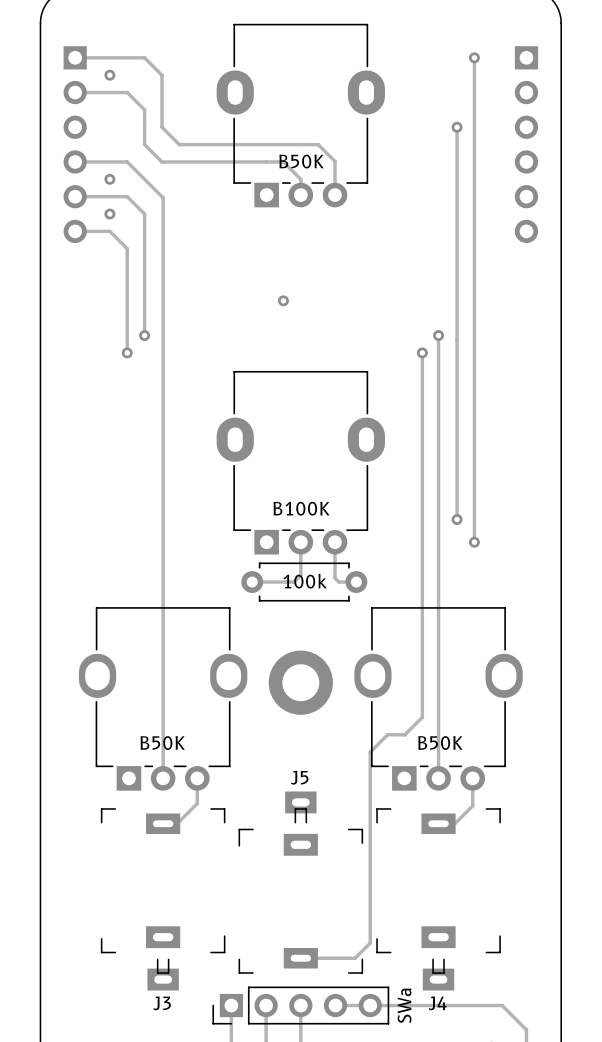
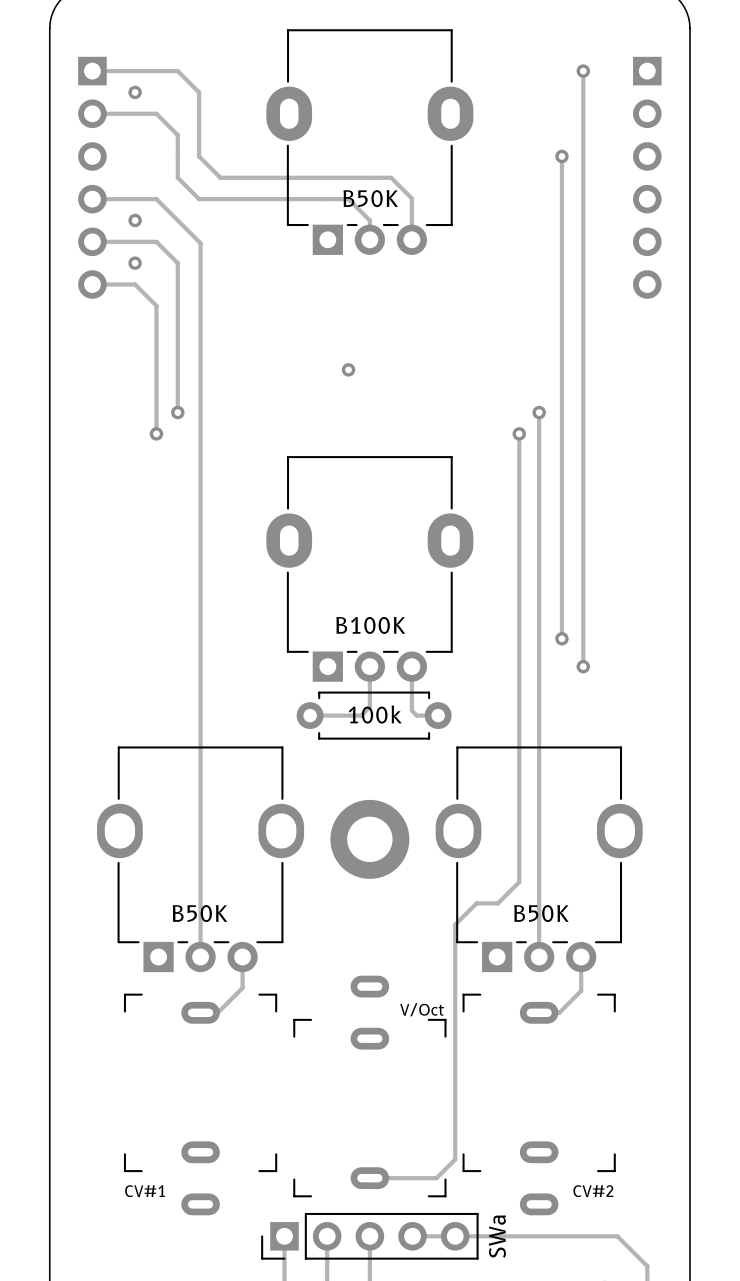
J5: (300, 882) -> none
part: none -> V/Oct (369, 1086)
part: none -> CV#1 (200, 1104)
part: none -> CV#2 (539, 1104)
J3: (163, 899) -> none
J4: (438, 899) -> none

